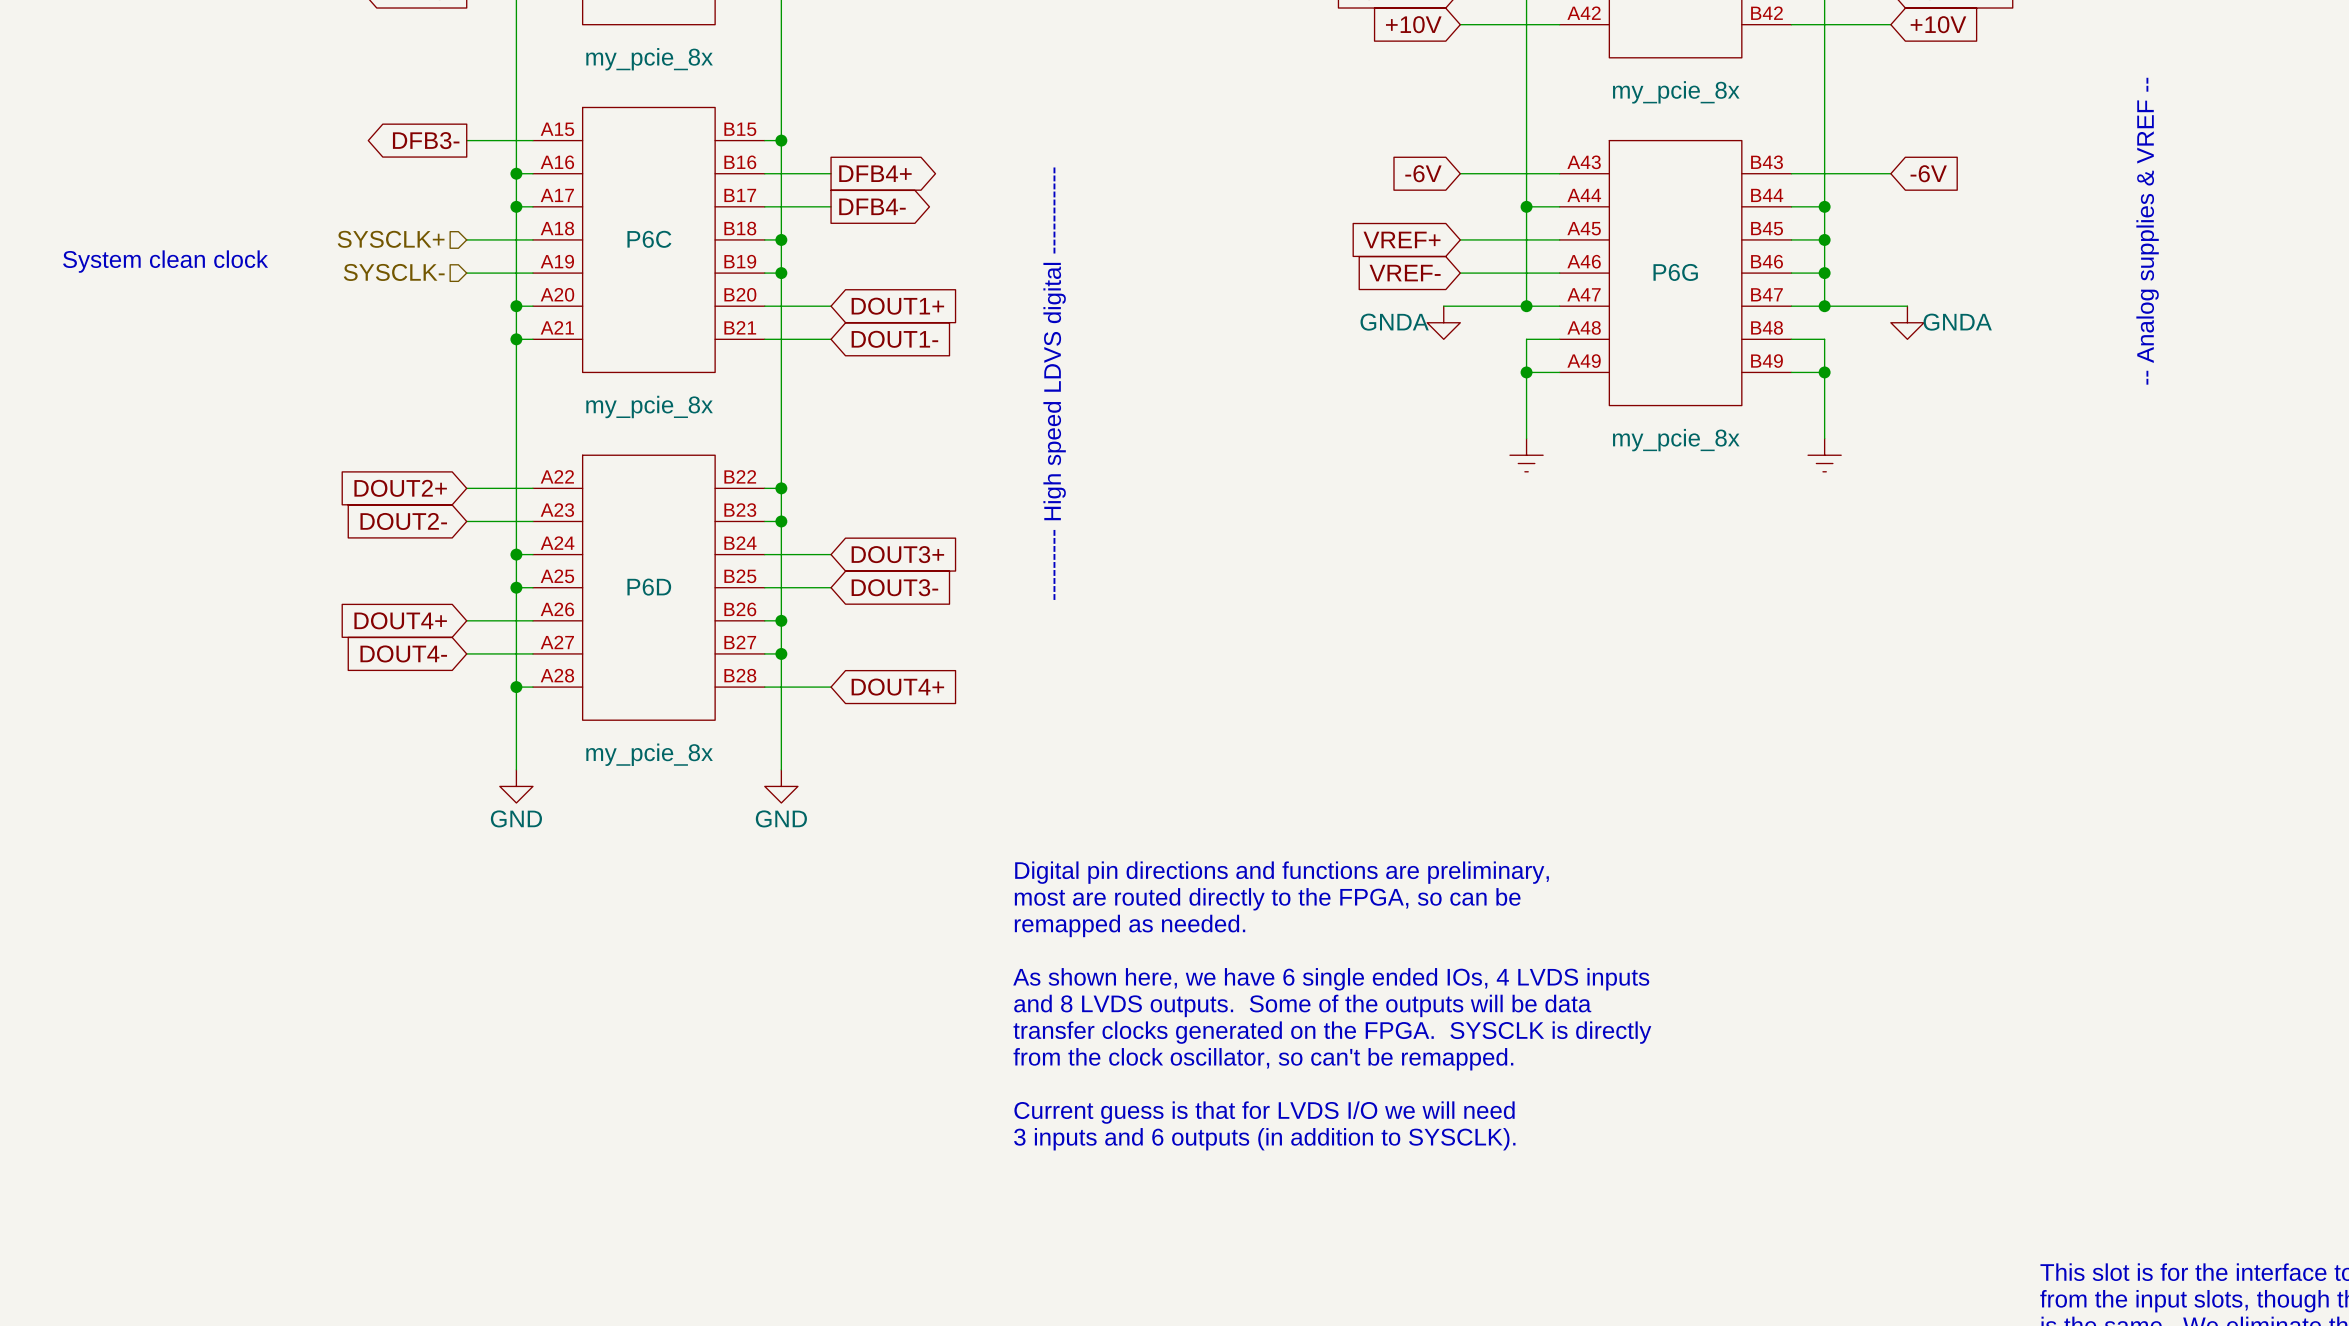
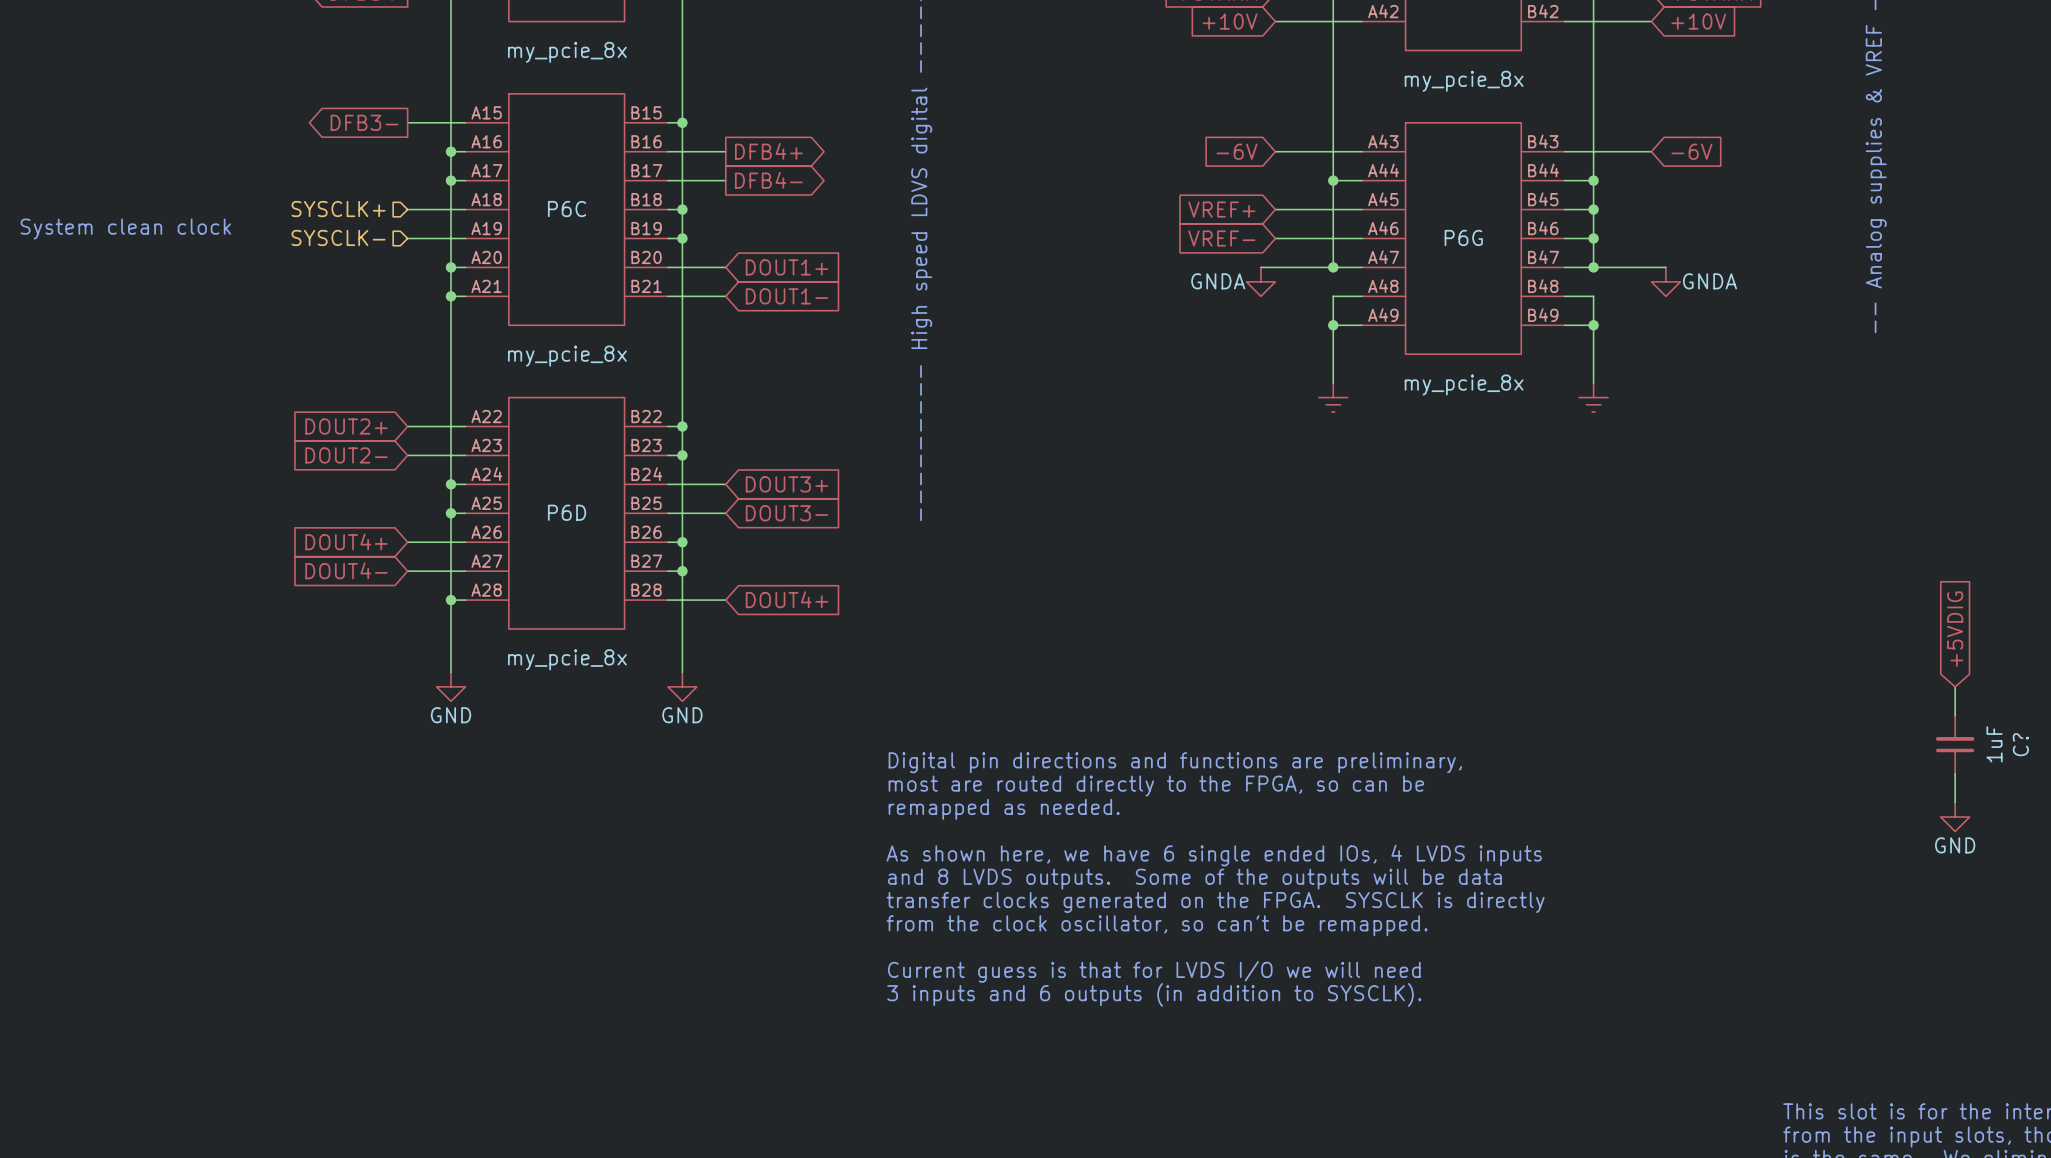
global label: none -> +5VDIG (1955, 629)
wire: none -> (1955, 686) (1955, 715)
C?: none -> 1uF (1955, 744)
wire: none -> (1955, 773) (1955, 802)
power symbol: none -> GND (1955, 817)

